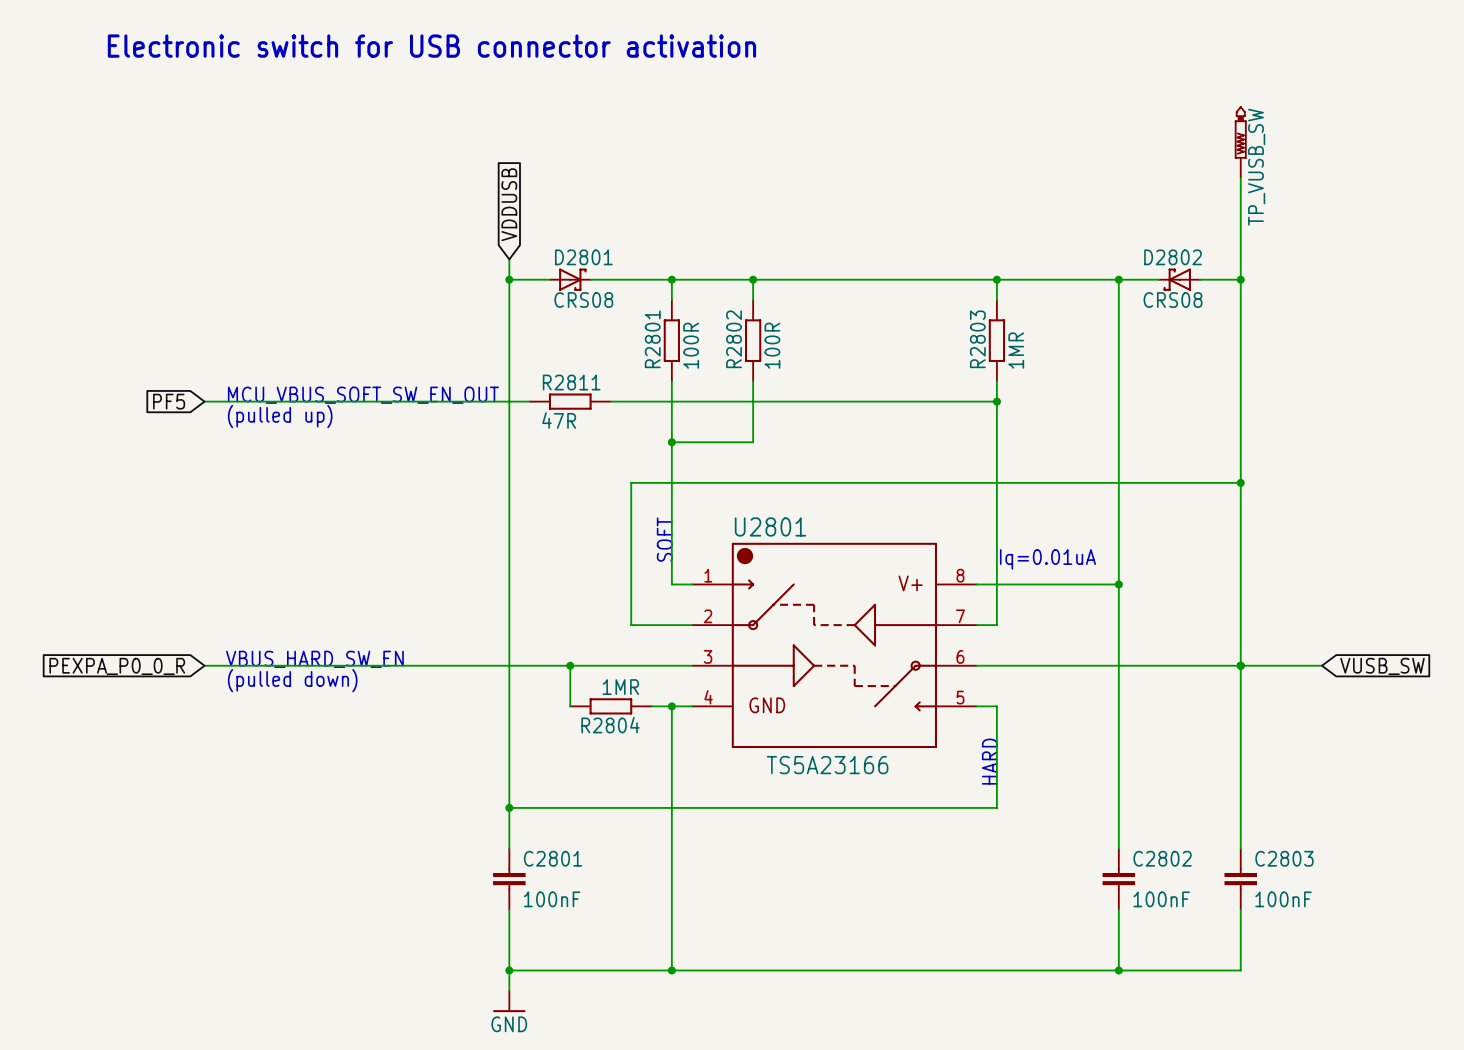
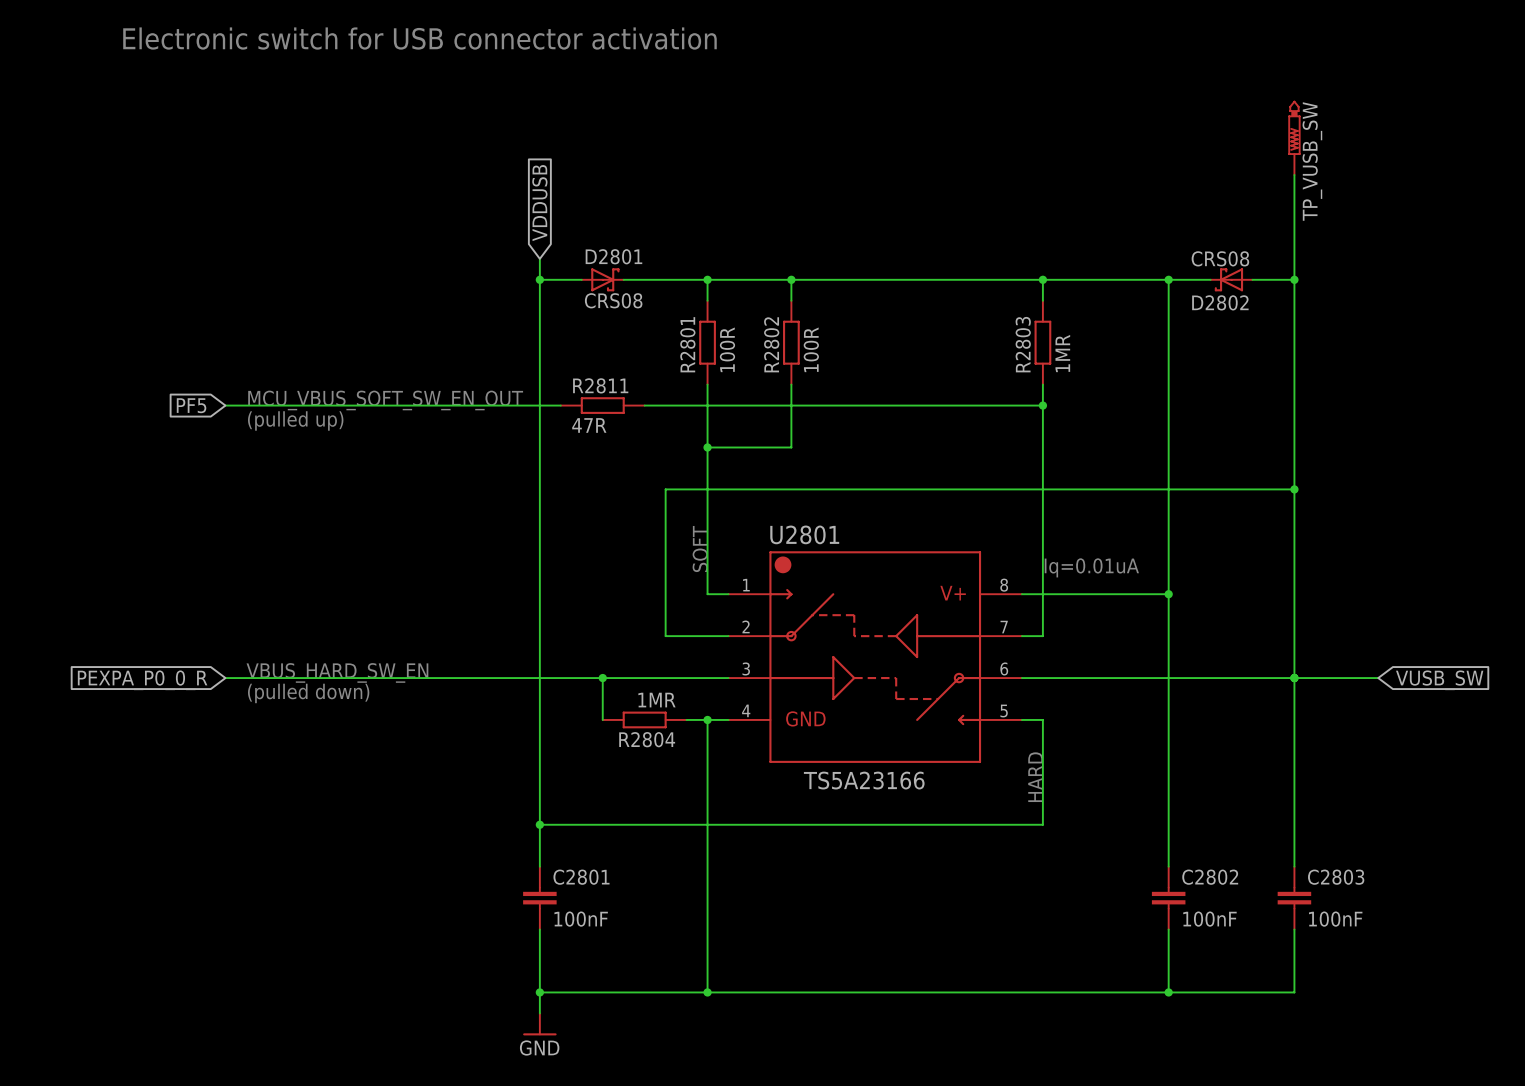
D2802 name position: D2802 (1173, 257) -> D2802 (1220, 302)
D2802 value position: CRS08 (1173, 300) -> CRS08 (1220, 258)

